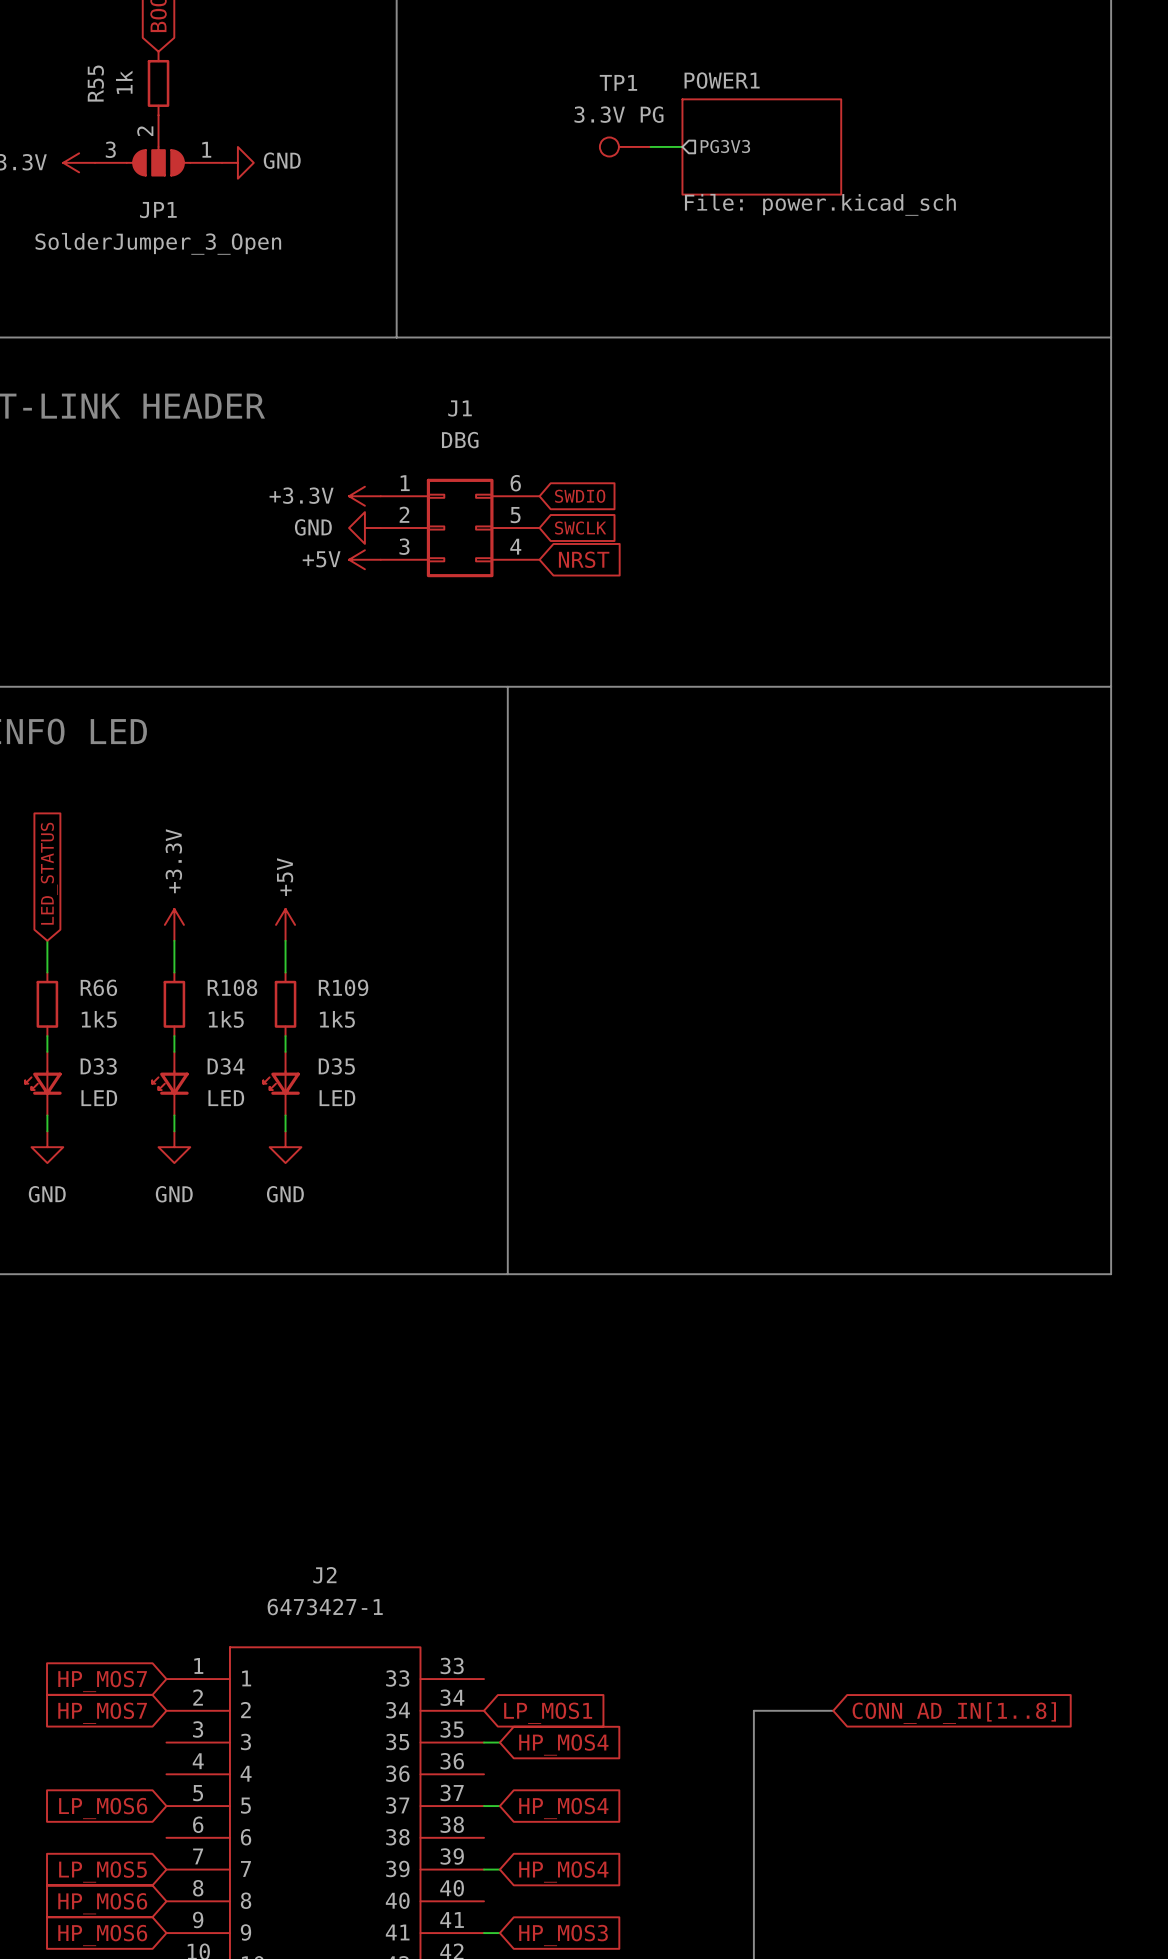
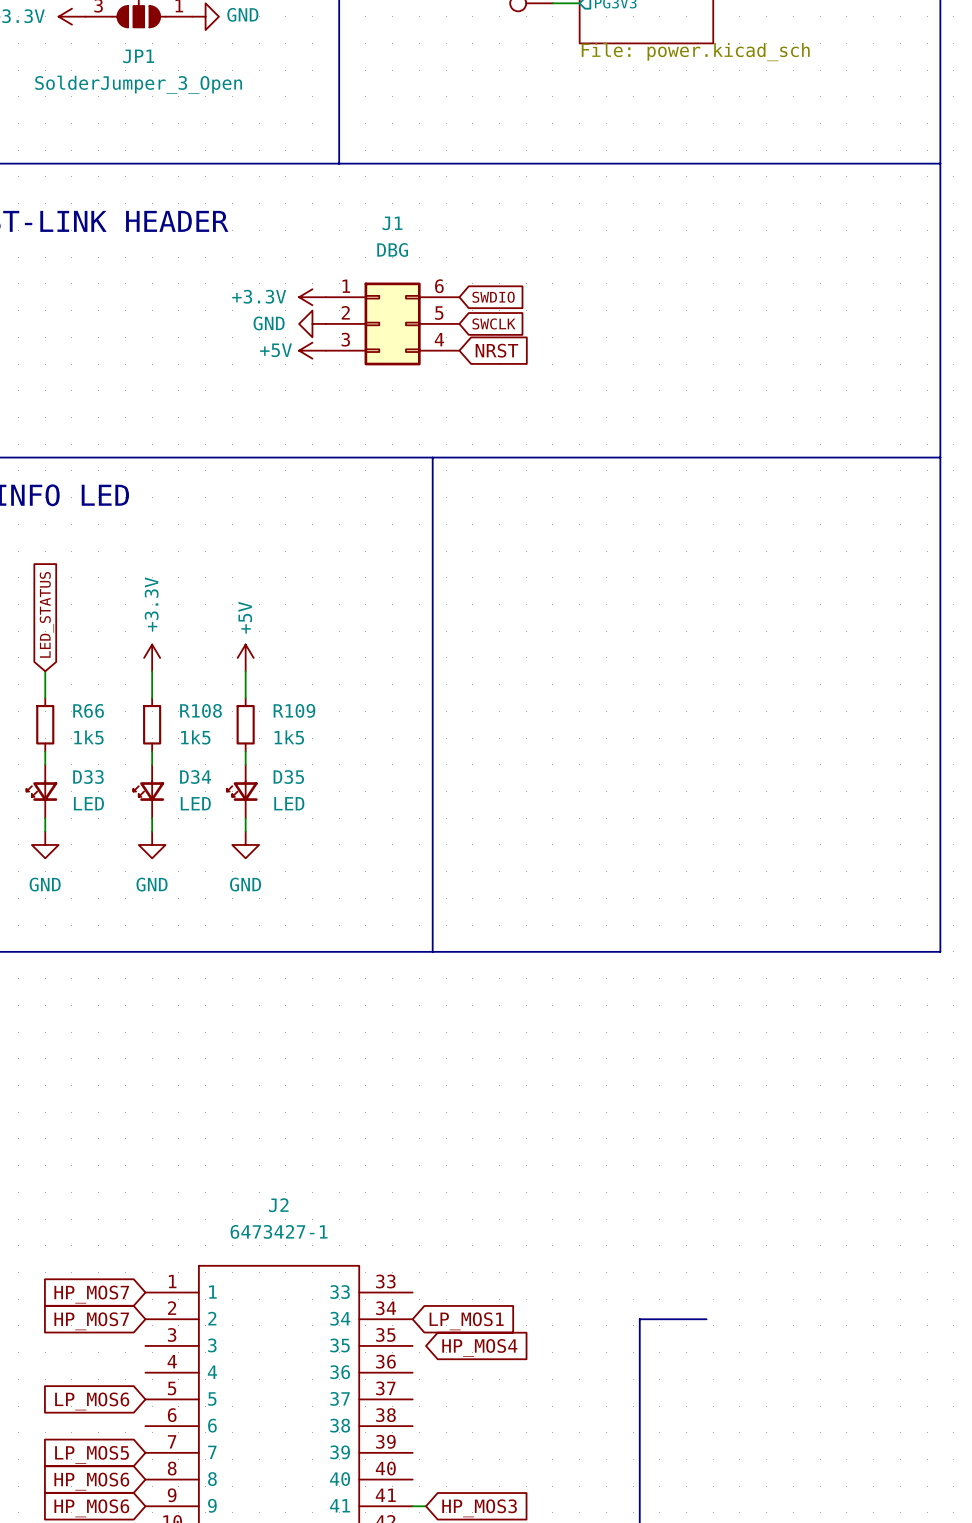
global label: CONN_AD_IN[1..8] (954, 1713) -> none
wire: (483, 1742) (499, 1742) -> none
wire: (483, 1806) (499, 1806) -> none
global label: HP_MOS4 (563, 1808) -> none
wire: (483, 1869) (499, 1869) -> none
global label: HP_MOS4 (563, 1871) -> none

